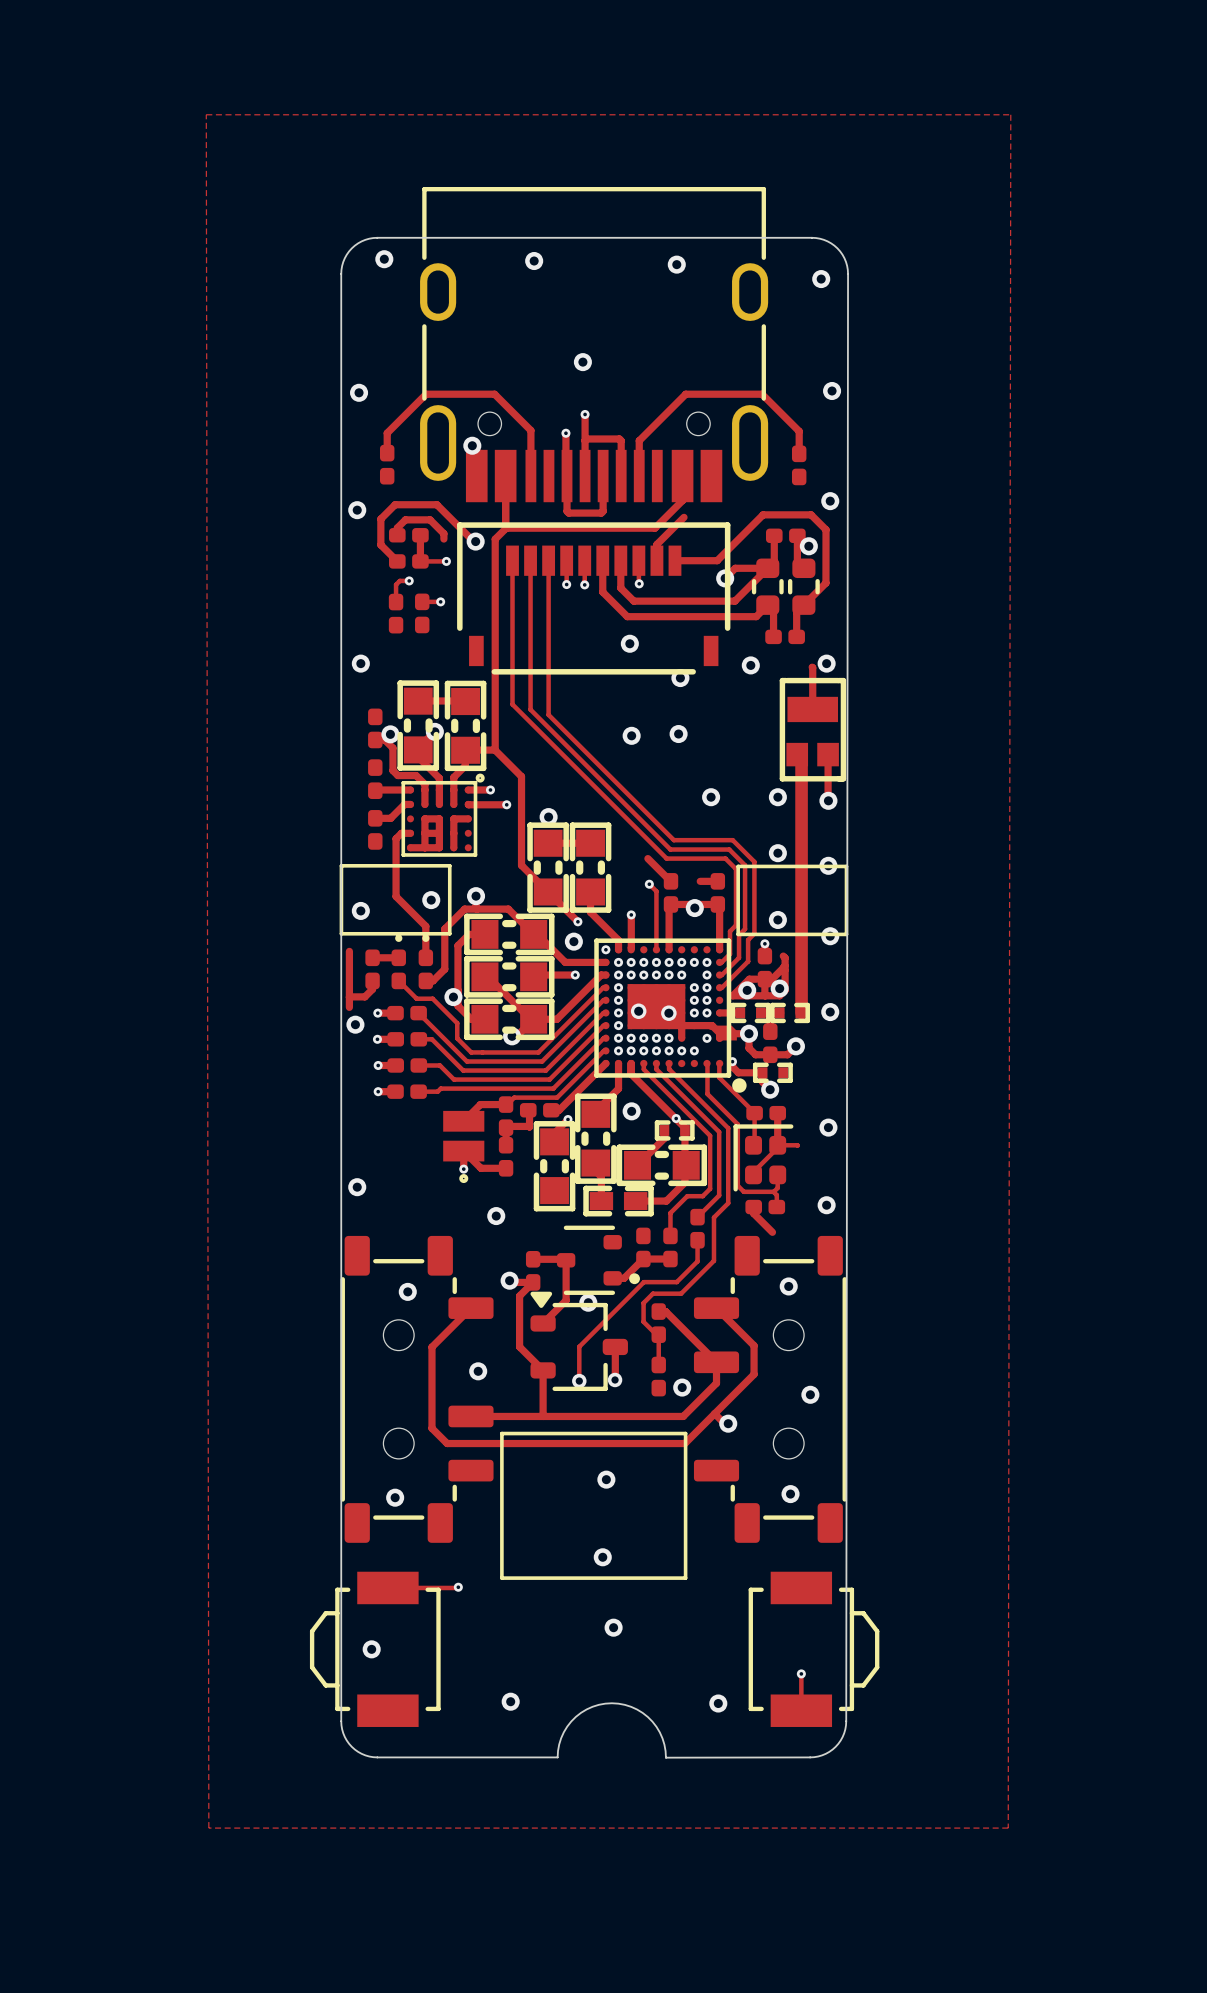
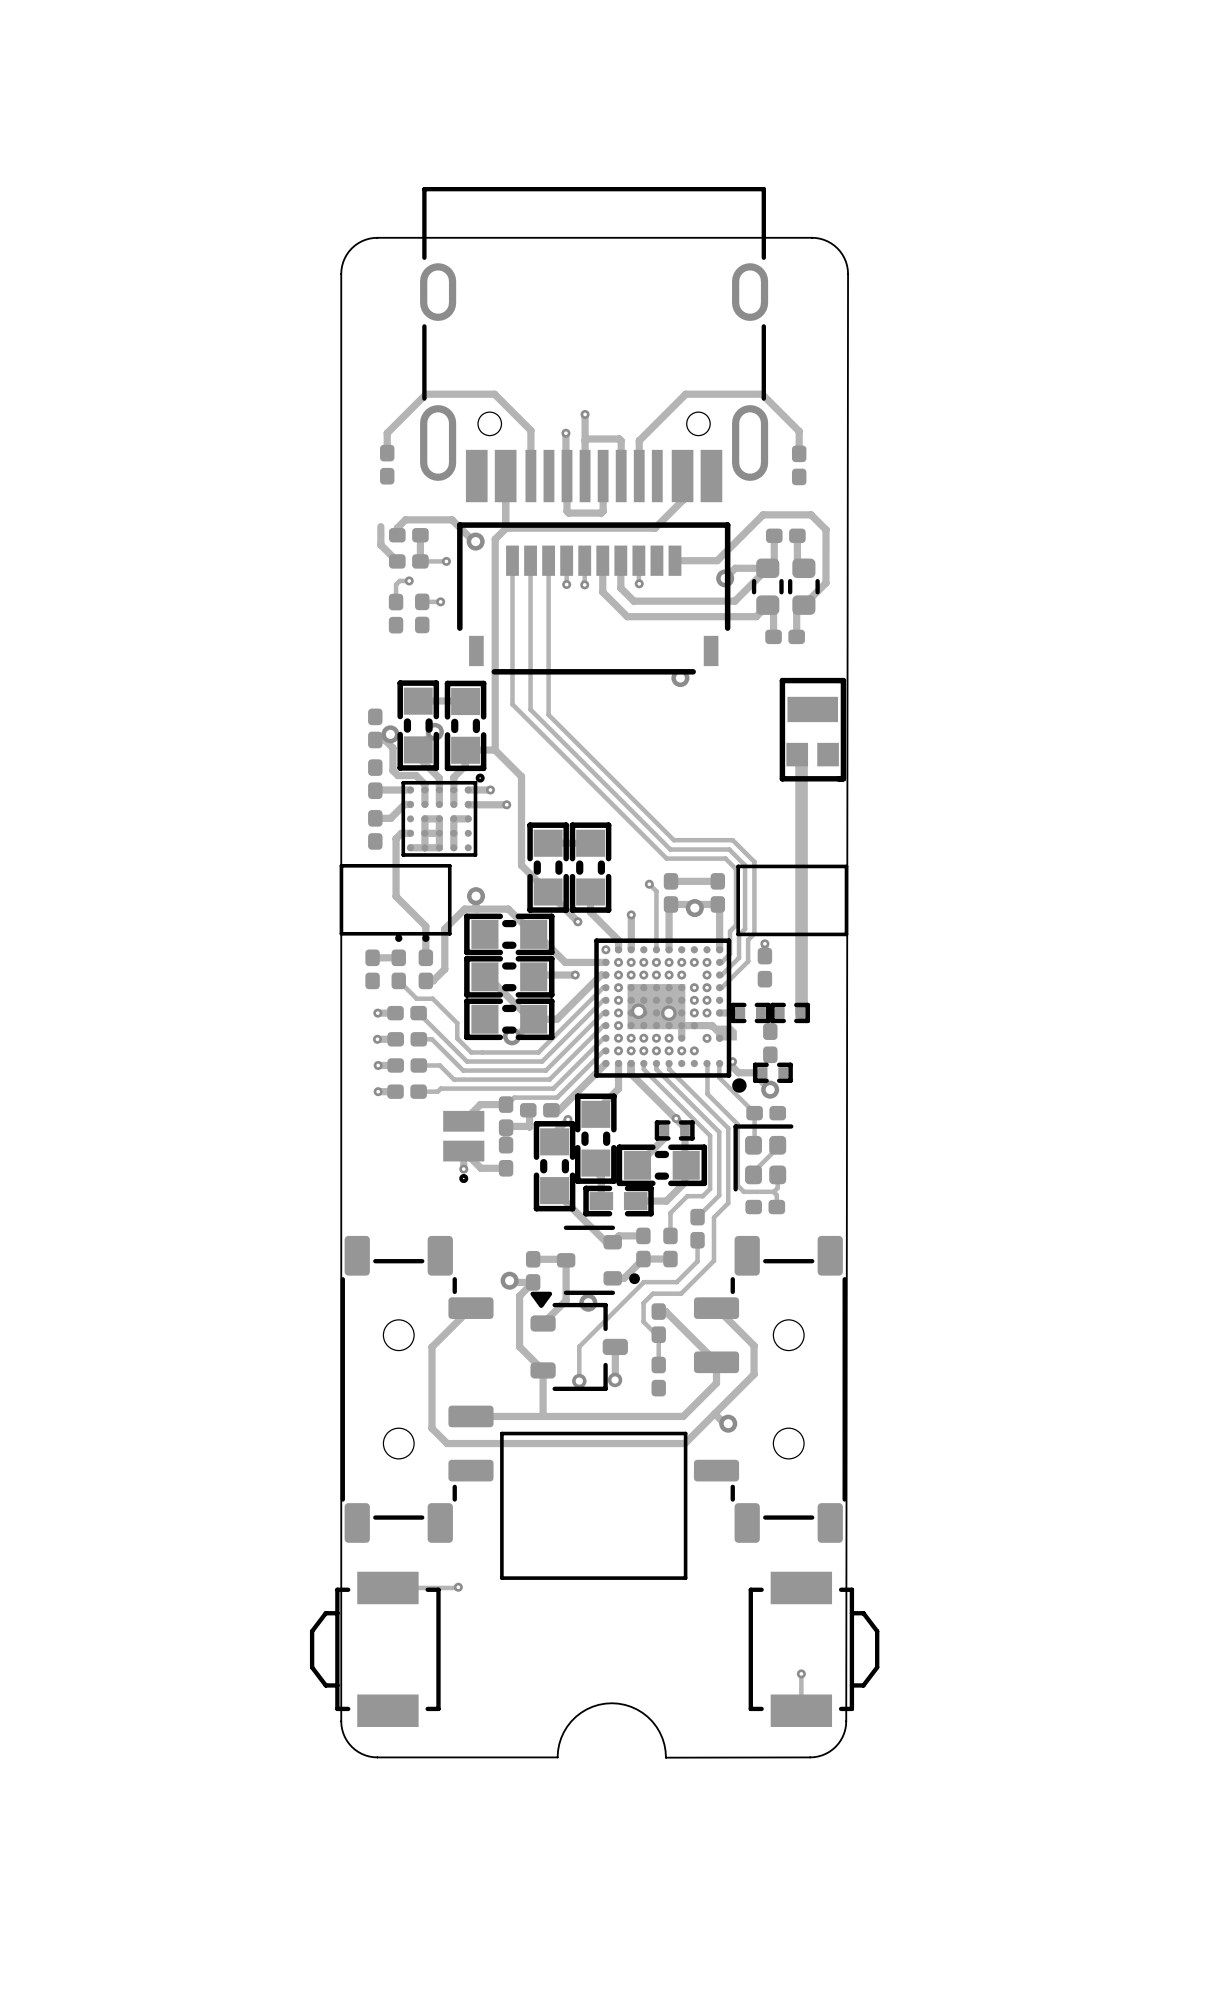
zone outline: (206, 114) (1010, 114) (1008, 1828) (208, 1828) (206, 114) -> none
via: (384, 259) -> none
via: (534, 261) -> none
via: (676, 264) -> none
via: (821, 279) -> none
via: (582, 362) -> none
via: (832, 391) -> none
via: (359, 392) -> none
via: (472, 445) -> none
via: (830, 501) -> none
via: (357, 510) -> none
track: (684, 517) (656, 544) (656, 560) -> none
track: (430, 519) (443, 533) (443, 539) -> (430, 519) (452, 519)
track: (452, 519) (436, 504) (395, 504) (380, 519) (380, 526) -> none
via: (808, 546) -> none
via: (629, 643) -> none
via: (360, 663) -> none
via: (826, 663) -> none
via: (750, 665) -> none
track: (812, 667) (812, 709) -> none
via: (678, 734) -> none
via: (631, 735) -> none
track: (828, 754) (828, 800) -> none
via: (711, 797) -> none
via: (777, 797) -> none
via: (828, 800) -> none
via: (548, 817) -> none
via: (777, 853) -> none
track: (647, 858) (670, 881) -> (700, 881) (670, 881)
via: (828, 865) -> none
via: (431, 900) -> none
via: (360, 910) -> none
via: (777, 919) -> none
track: (484, 934) (469, 934) (457, 945) (457, 1005) (471, 1019) (484, 1019) -> none
via: (830, 936) -> none
via: (573, 941) -> none
track: (349, 951) (349, 1007) -> none
track: (783, 956) (785, 966) (772, 979) (764, 979) (764, 995) -> none
track: (783, 968) (785, 969) (785, 990) (779, 995) (732, 995) (749, 979) (756, 979) -> none
track: (372, 980) (372, 989) (364, 996) (349, 996) -> none
via: (779, 988) -> none
via: (747, 990) -> none
via: (453, 997) -> none
via: (830, 1012) -> none
via: (355, 1024) -> none
track: (726, 1033) (749, 1033) (749, 1048) (755, 1054) (787, 1054) (795, 1046) -> none
via: (749, 1033) -> none
via: (795, 1046) -> none
via: (631, 1111) -> none
track: (777, 1113) (777, 1145) (797, 1145) -> none
via: (828, 1127) -> none
via: (357, 1187) -> none
track: none -> (554, 1190) (606, 1242) (612, 1242) (619, 1235) (643, 1235)
via: (826, 1205) -> none
track: (753, 1207) (753, 1213) (772, 1232) -> none
via: (496, 1216) -> none
via: (788, 1286) -> none
via: (407, 1291) -> none
via: (478, 1371) -> none
via: (682, 1387) -> none
via: (810, 1394) -> none
via: (606, 1479) -> none
via: (790, 1494) -> none
via: (395, 1497) -> none
via: (602, 1557) -> none
via: (613, 1627) -> none
via: (371, 1649) -> none
via: (510, 1701) -> none
via: (718, 1703) -> none

